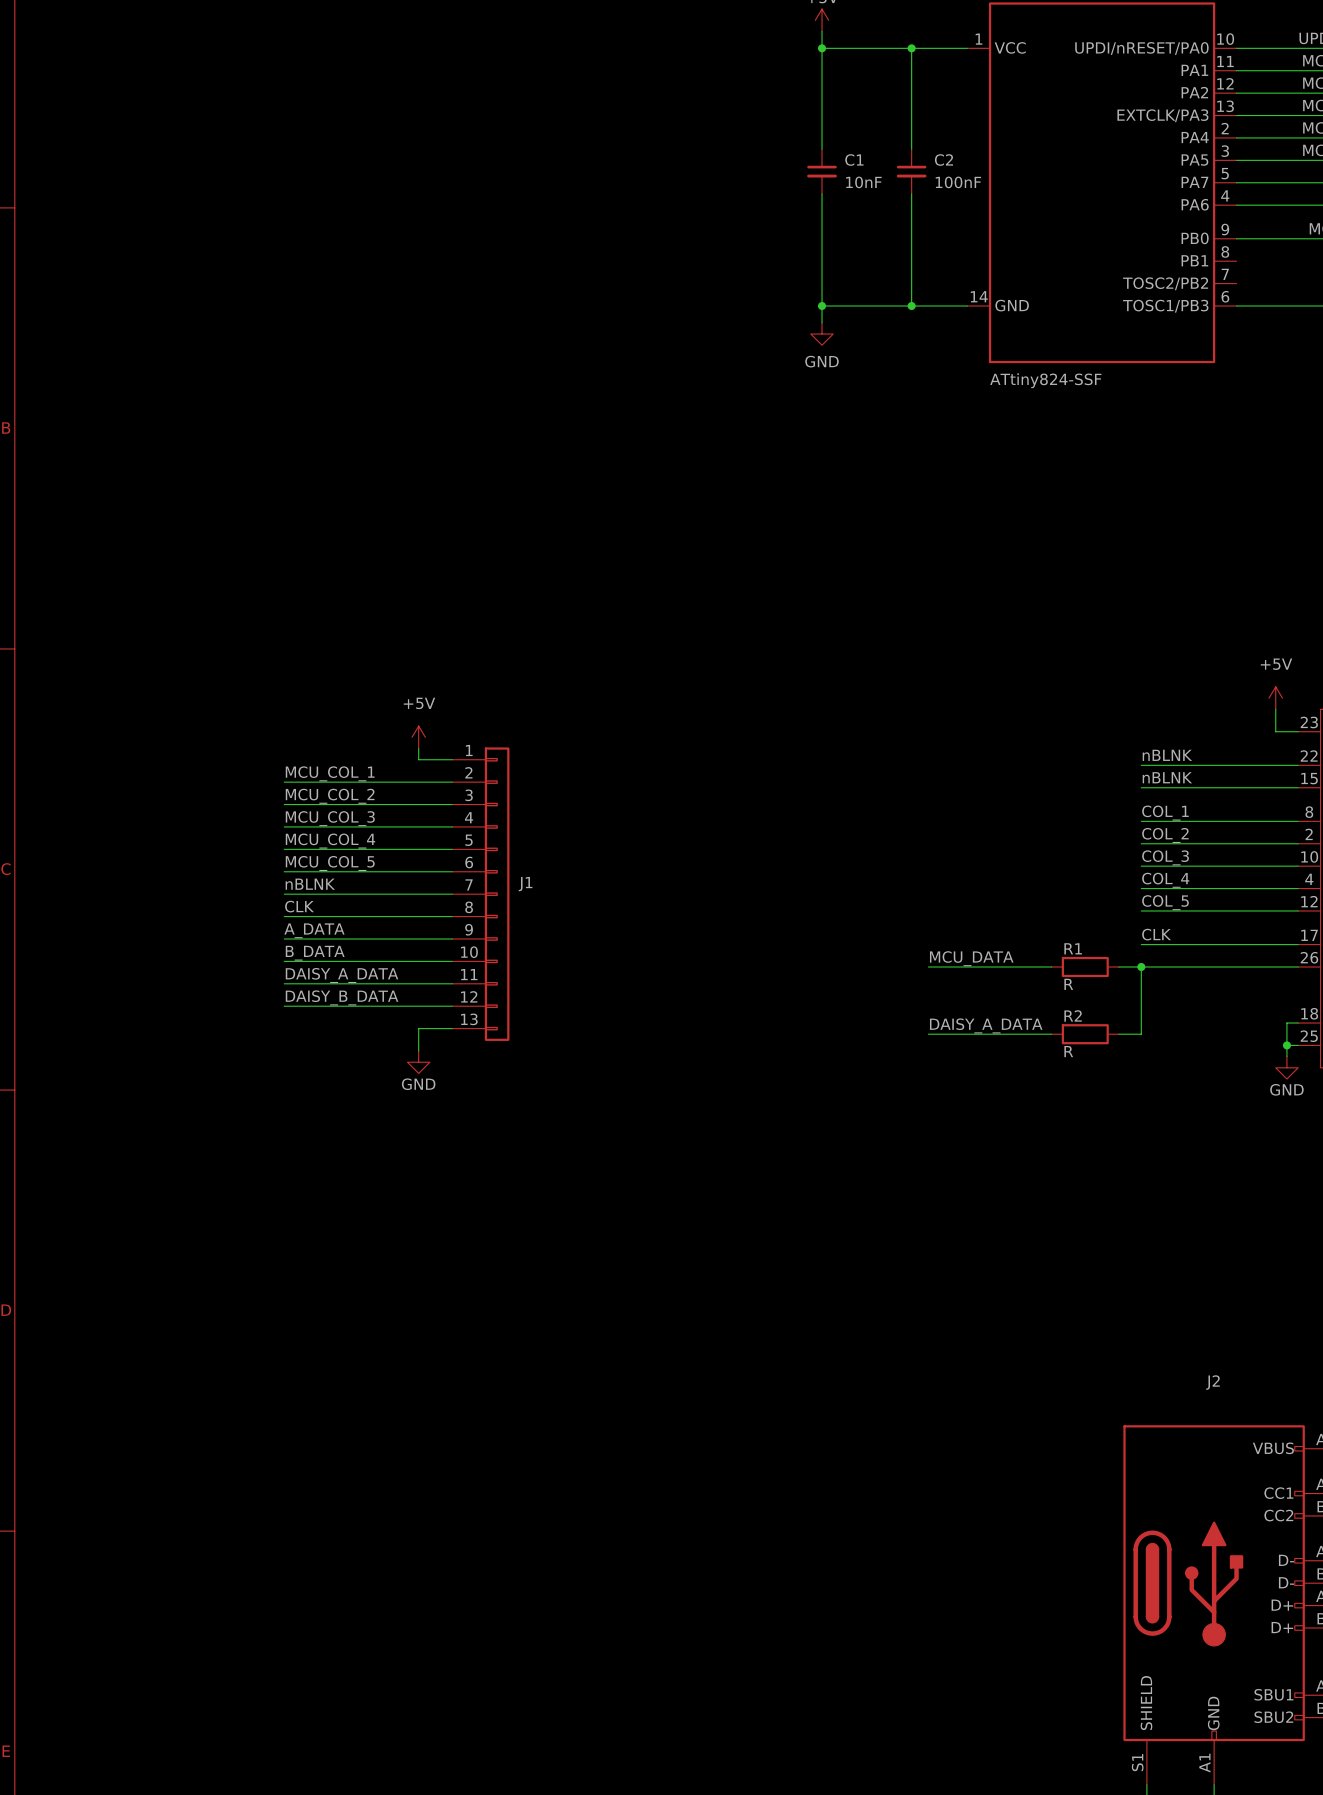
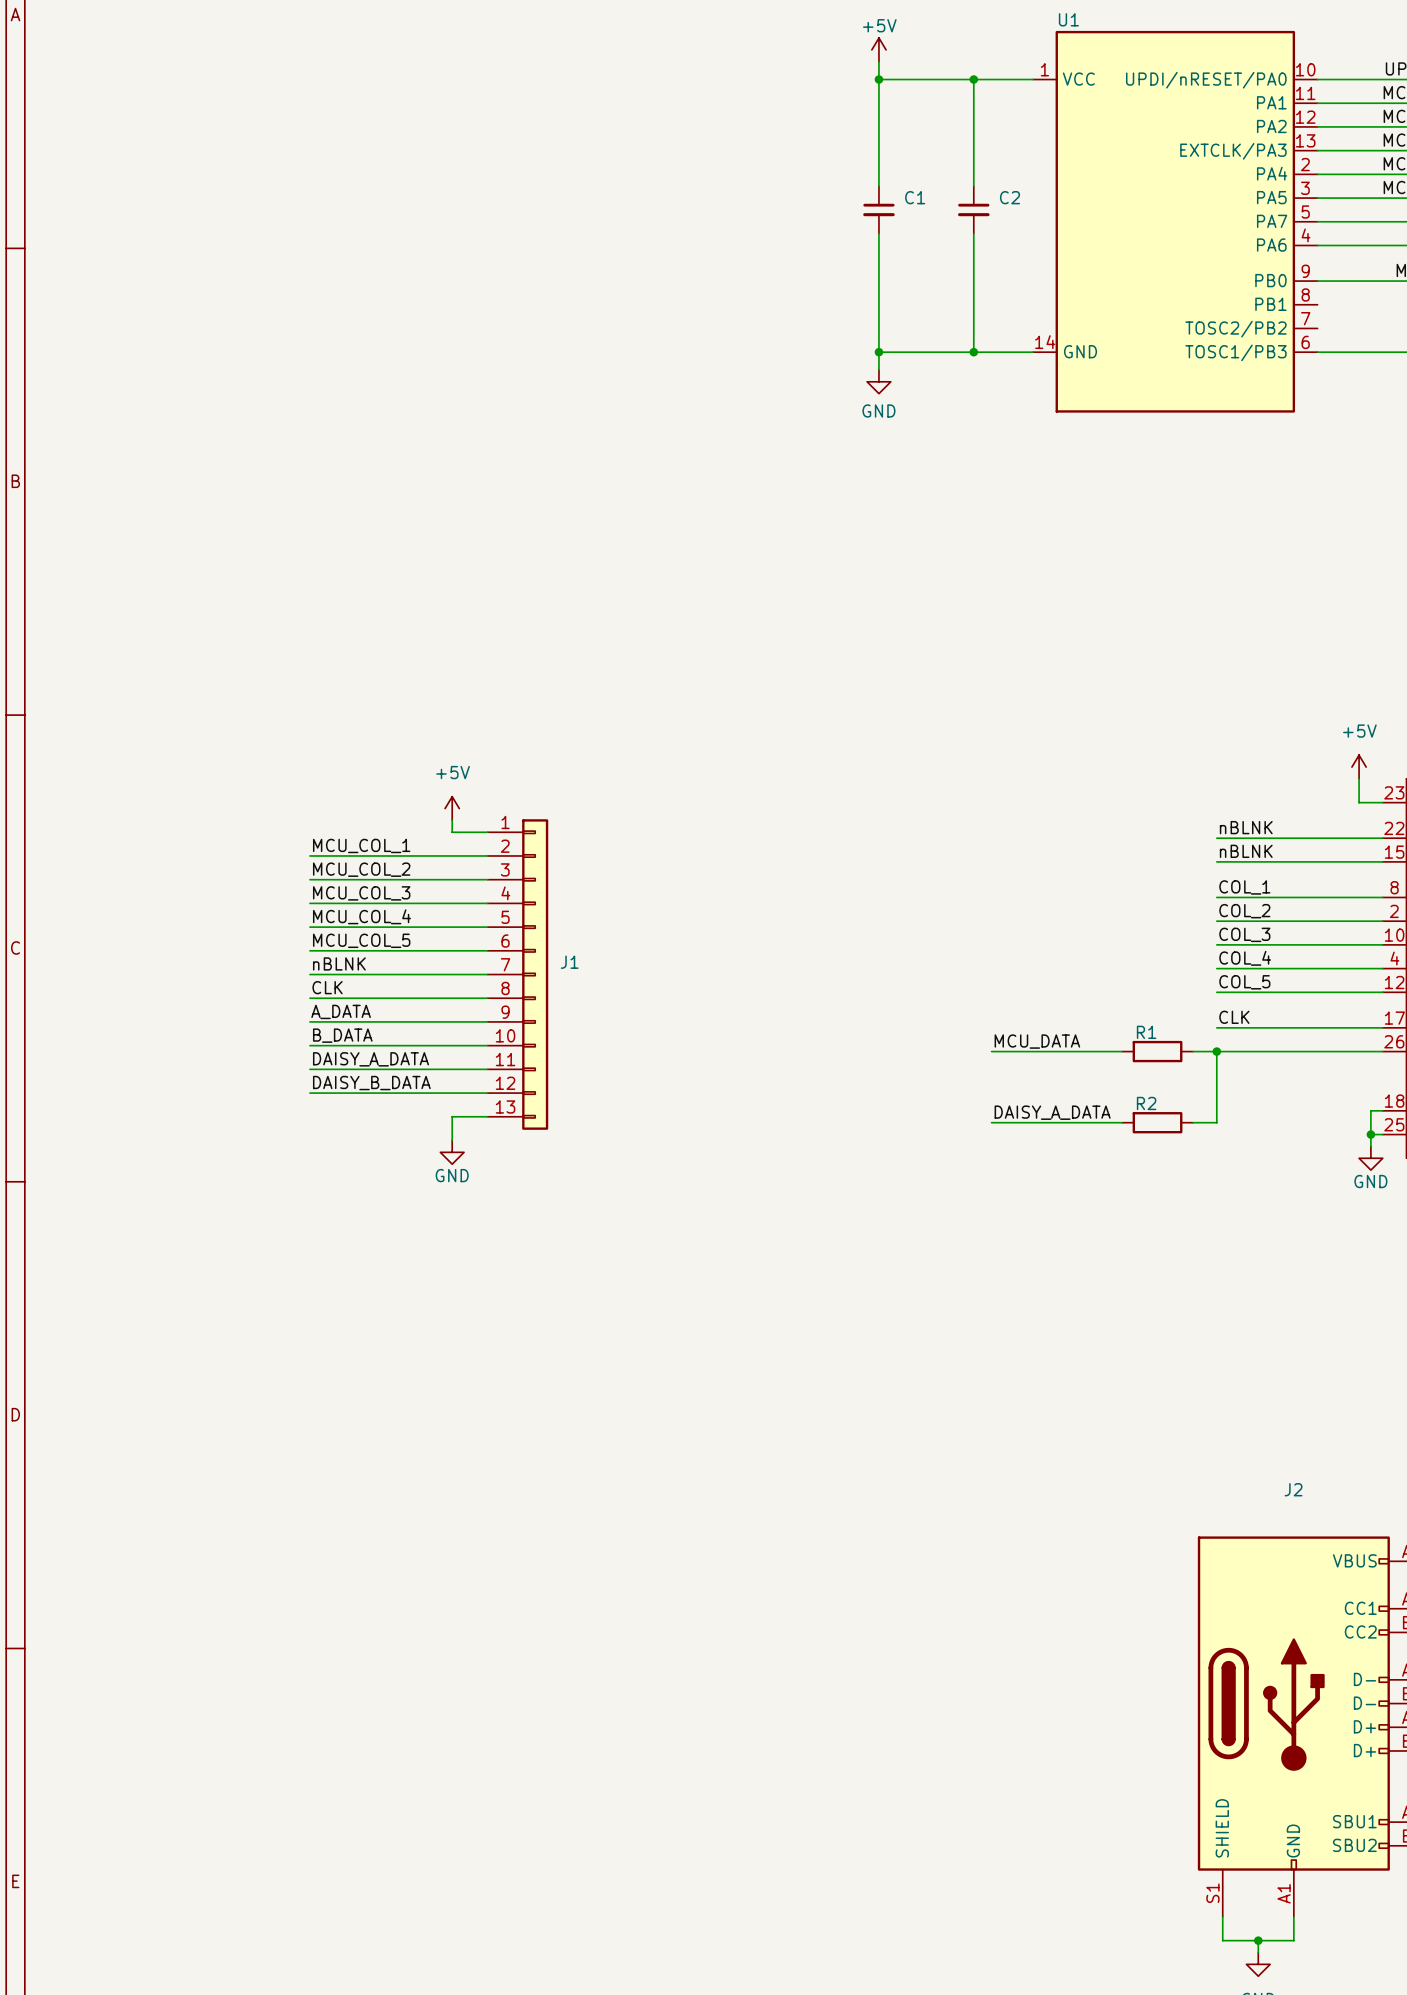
C1 value: 10nF (863, 182) -> none
C2 value: 100nF (958, 182) -> none
U1 value: ATtiny824-SSF (1045, 380) -> none
R1 value: R (1068, 984) -> none
R2 value: R (1068, 1051) -> none

